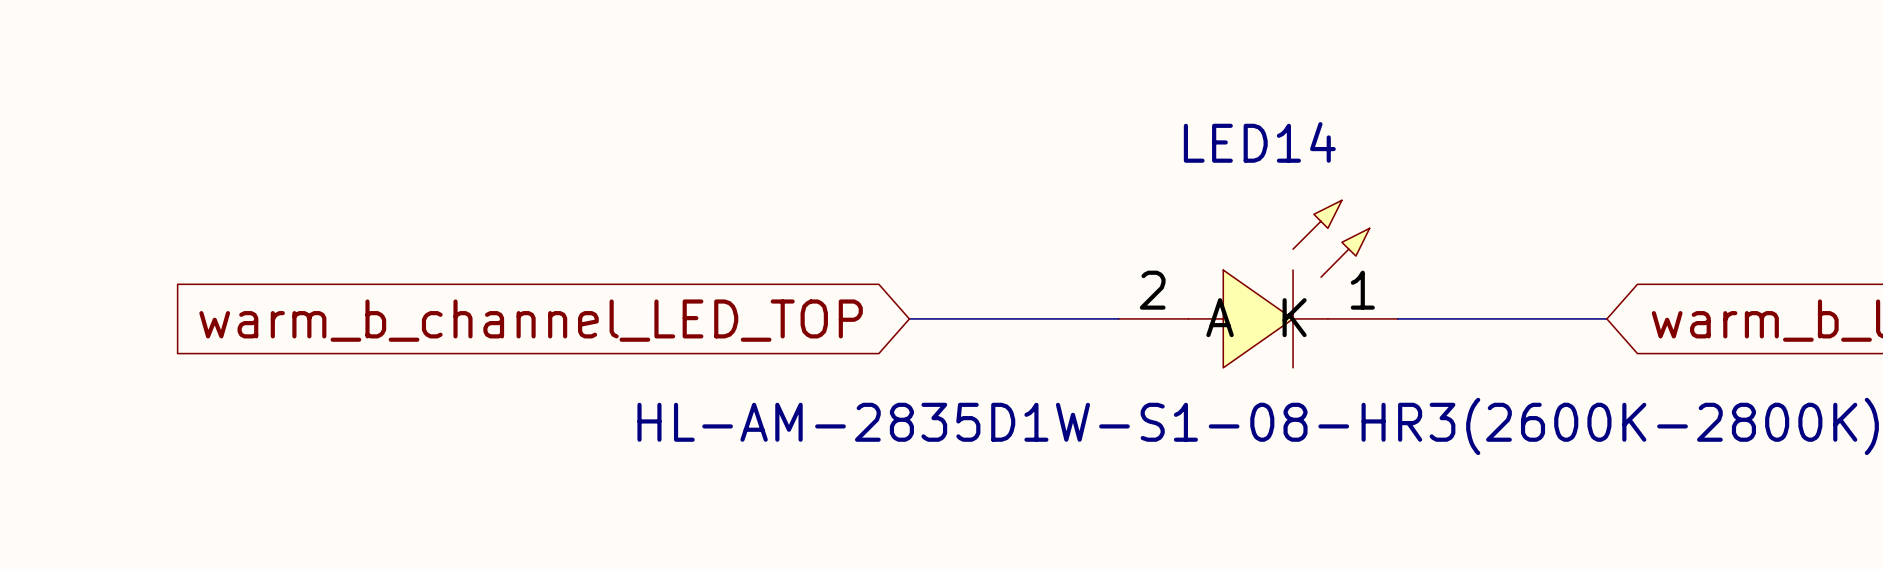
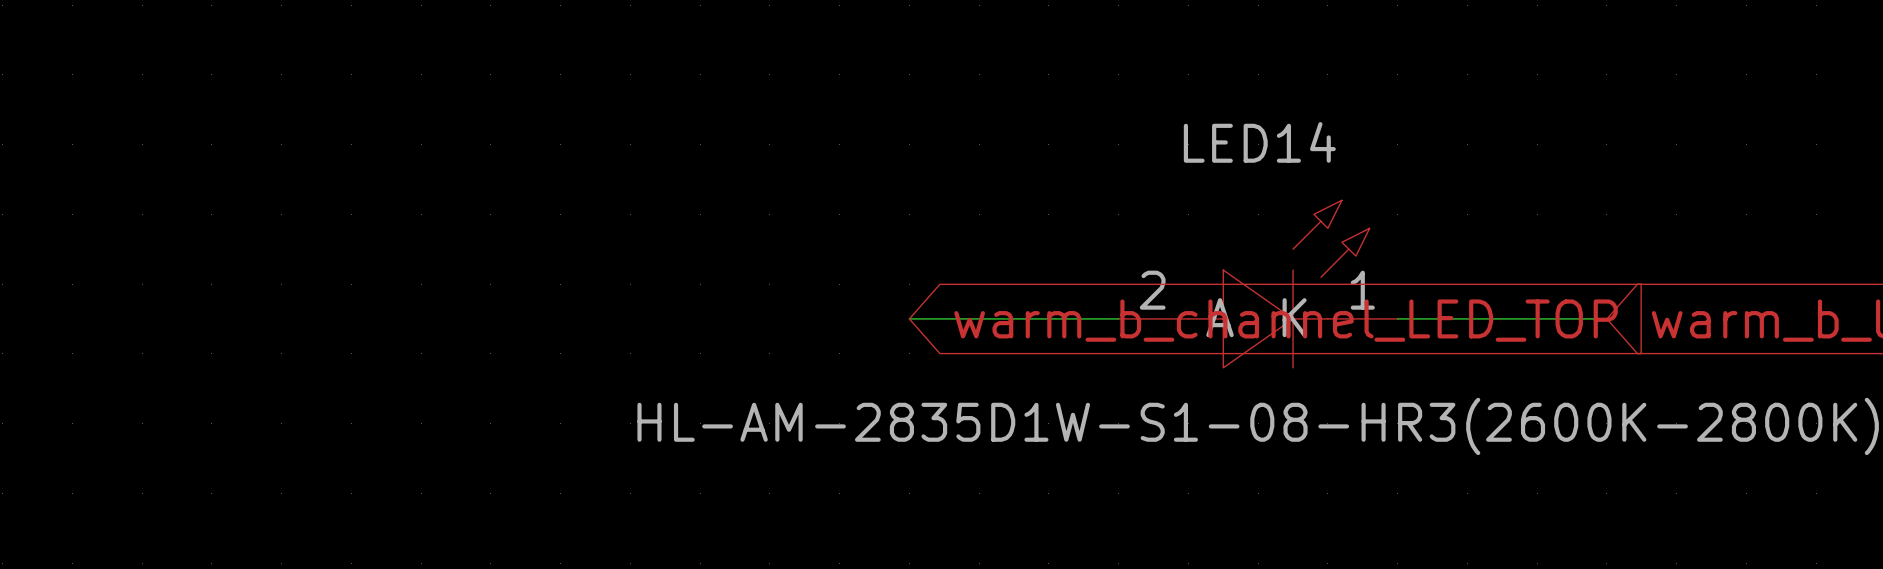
global label rotation: 0° (531, 320) -> 180° (1286, 320)
global label position: warm_b_channel_LED_TOP (531, 320) -> warm_b_channel_LED_TOP (1286, 320)

